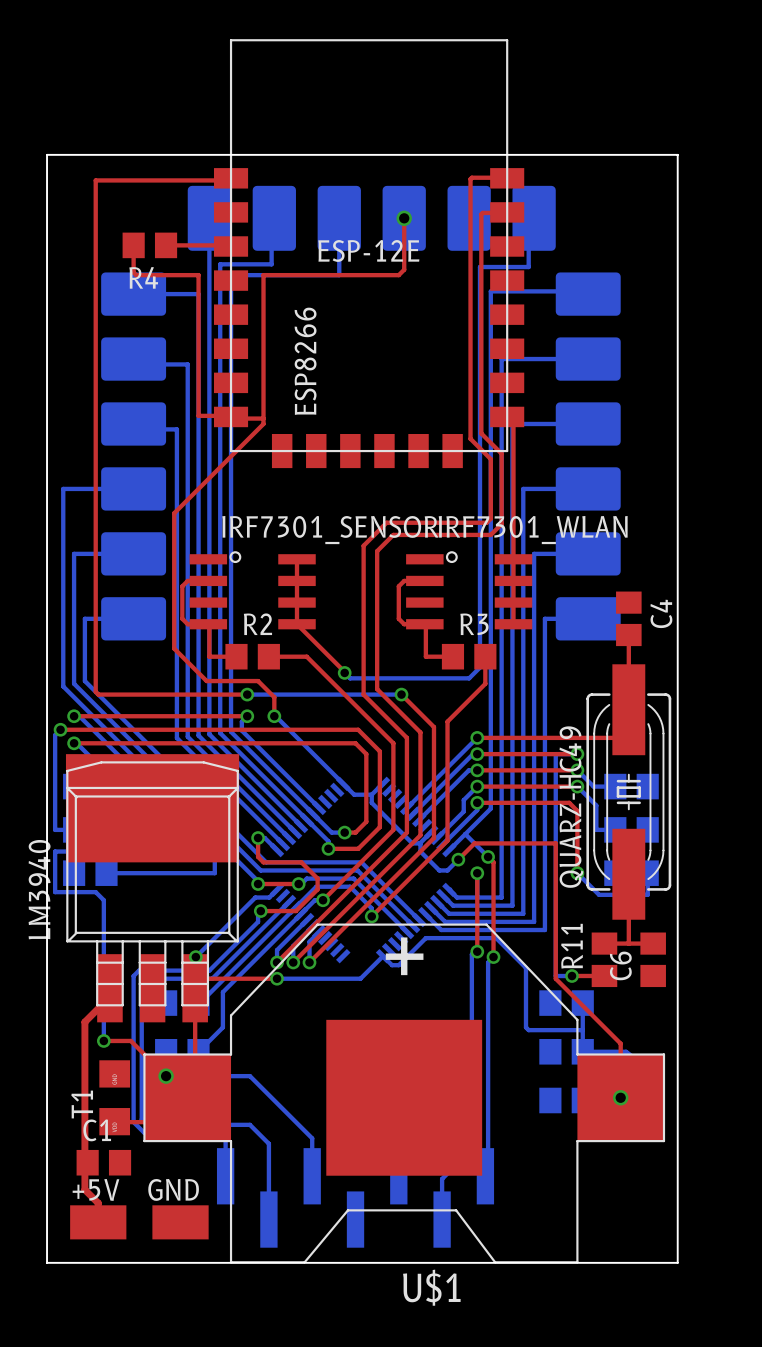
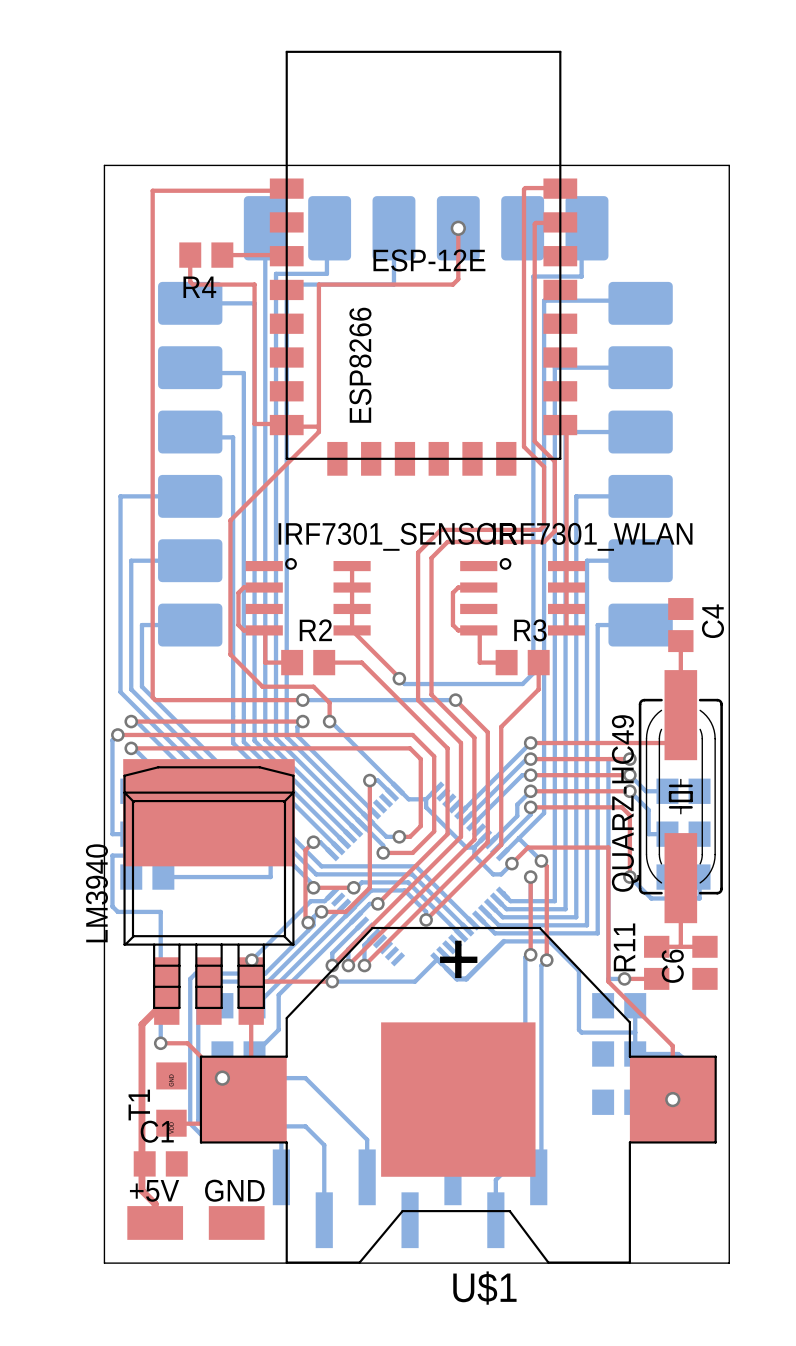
top track: none -> (369, 780) (369, 887) (345, 911) (321, 911)
bottom track: none -> (369, 780) (378, 780) (391, 794)
via: none -> (369, 780)
top track: (258, 838) (258, 856) (263, 862) (301, 862) (317, 878) (317, 889) (295, 911) (260, 911) -> (313, 842) (305, 850) (305, 919) (308, 922)
bottom track: (55, 892) (95, 892) (103, 900) (103, 908) -> (112, 895) (112, 906) (117, 911) (160, 911)
via: none -> (321, 911)
via: (260, 911) -> none
via: none -> (308, 922)
bottom track: (450, 938) (425, 938) (398, 965) (392, 965) -> (503, 941) (466, 978) (456, 978) (446, 968)

